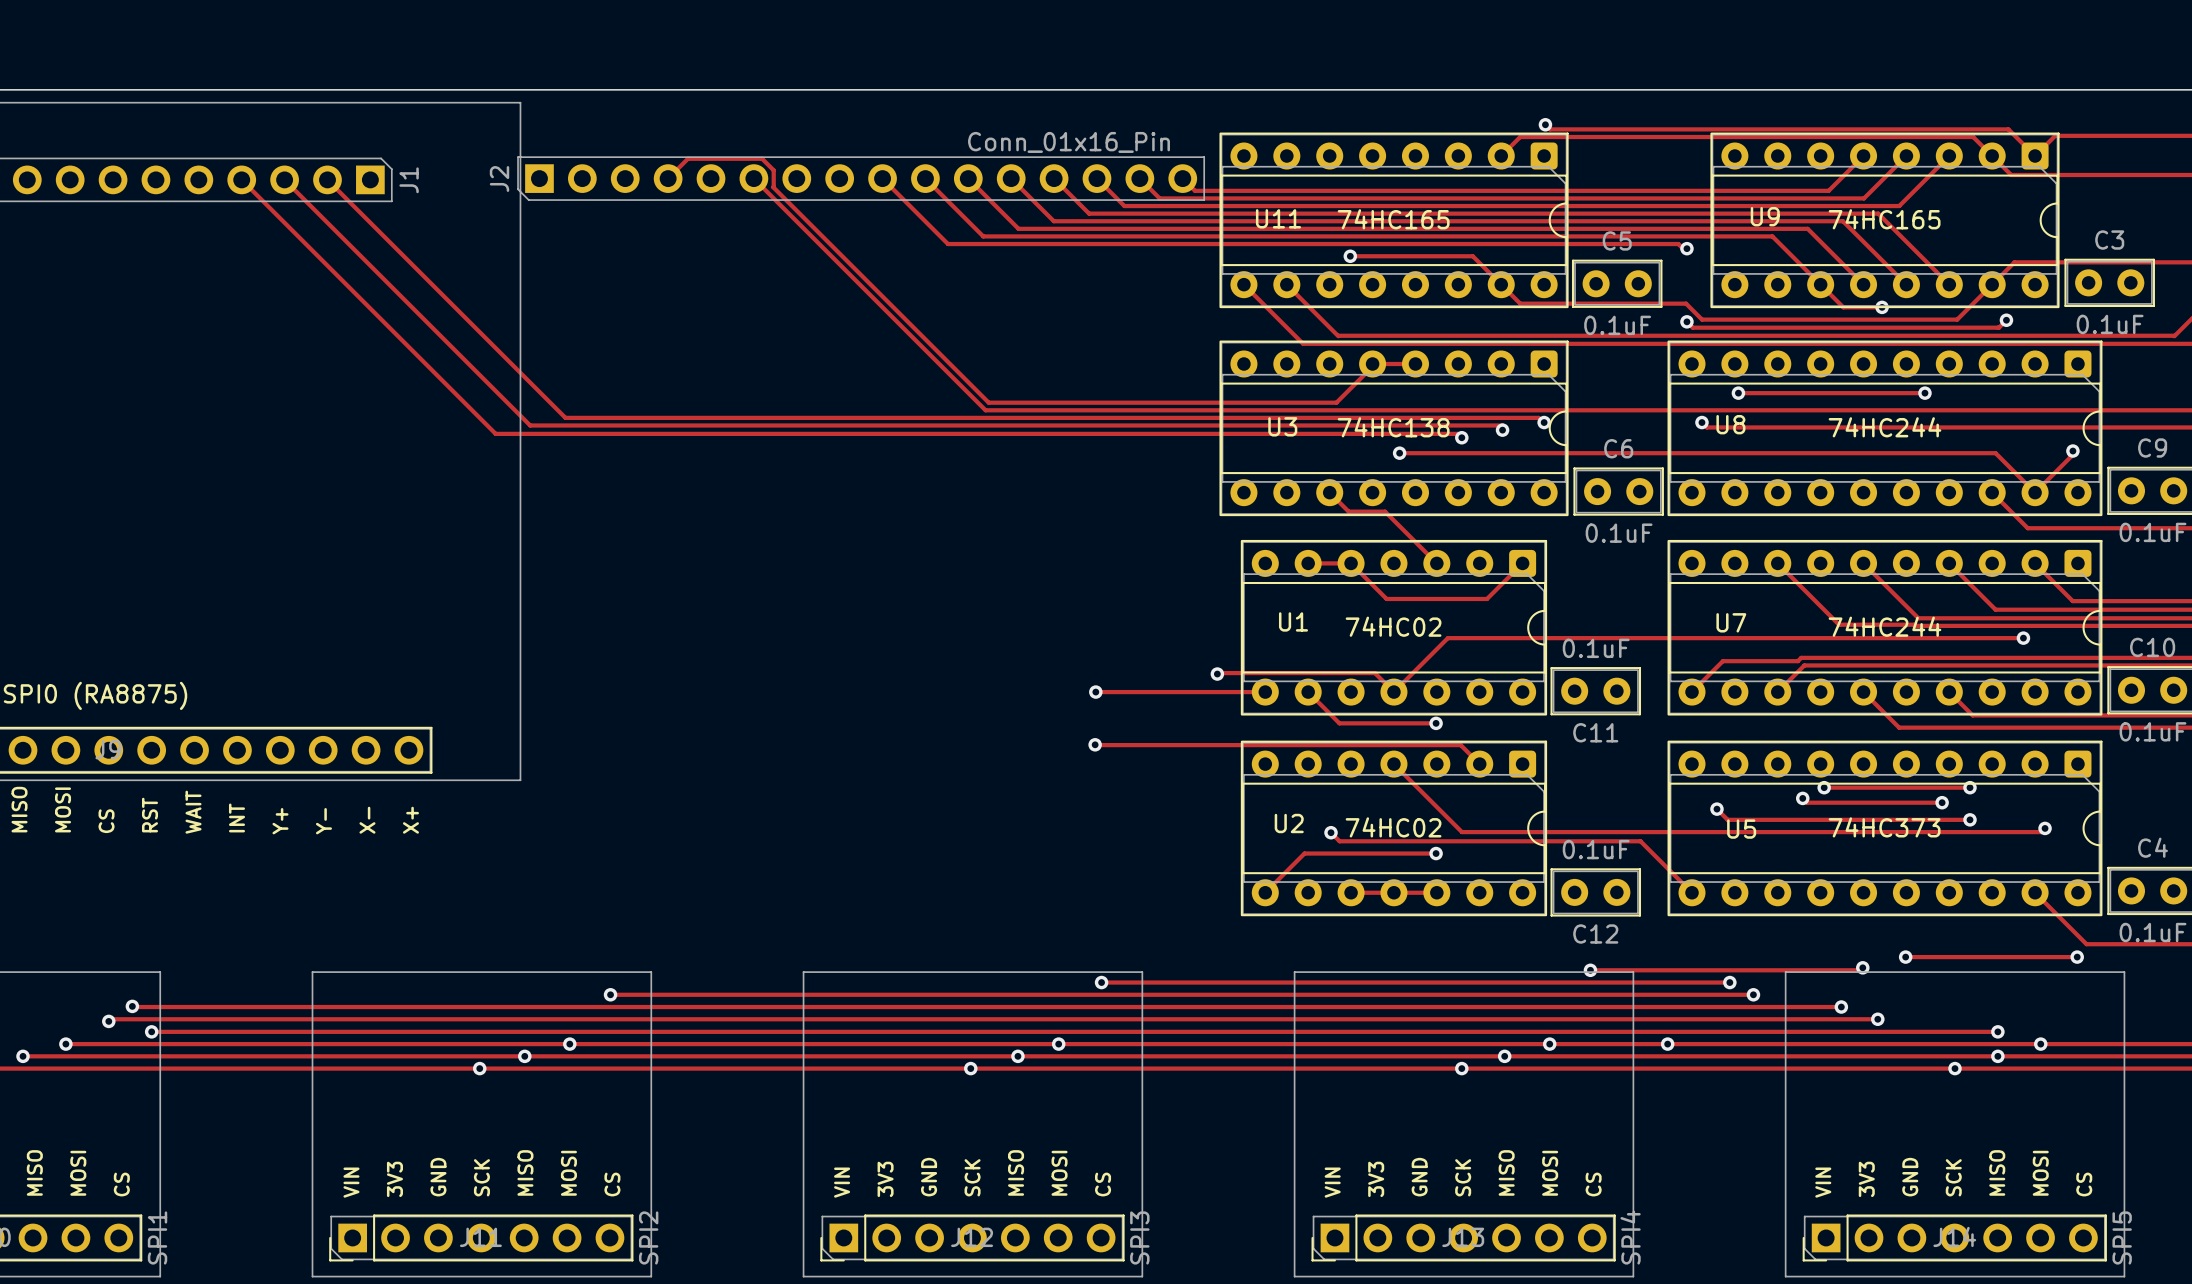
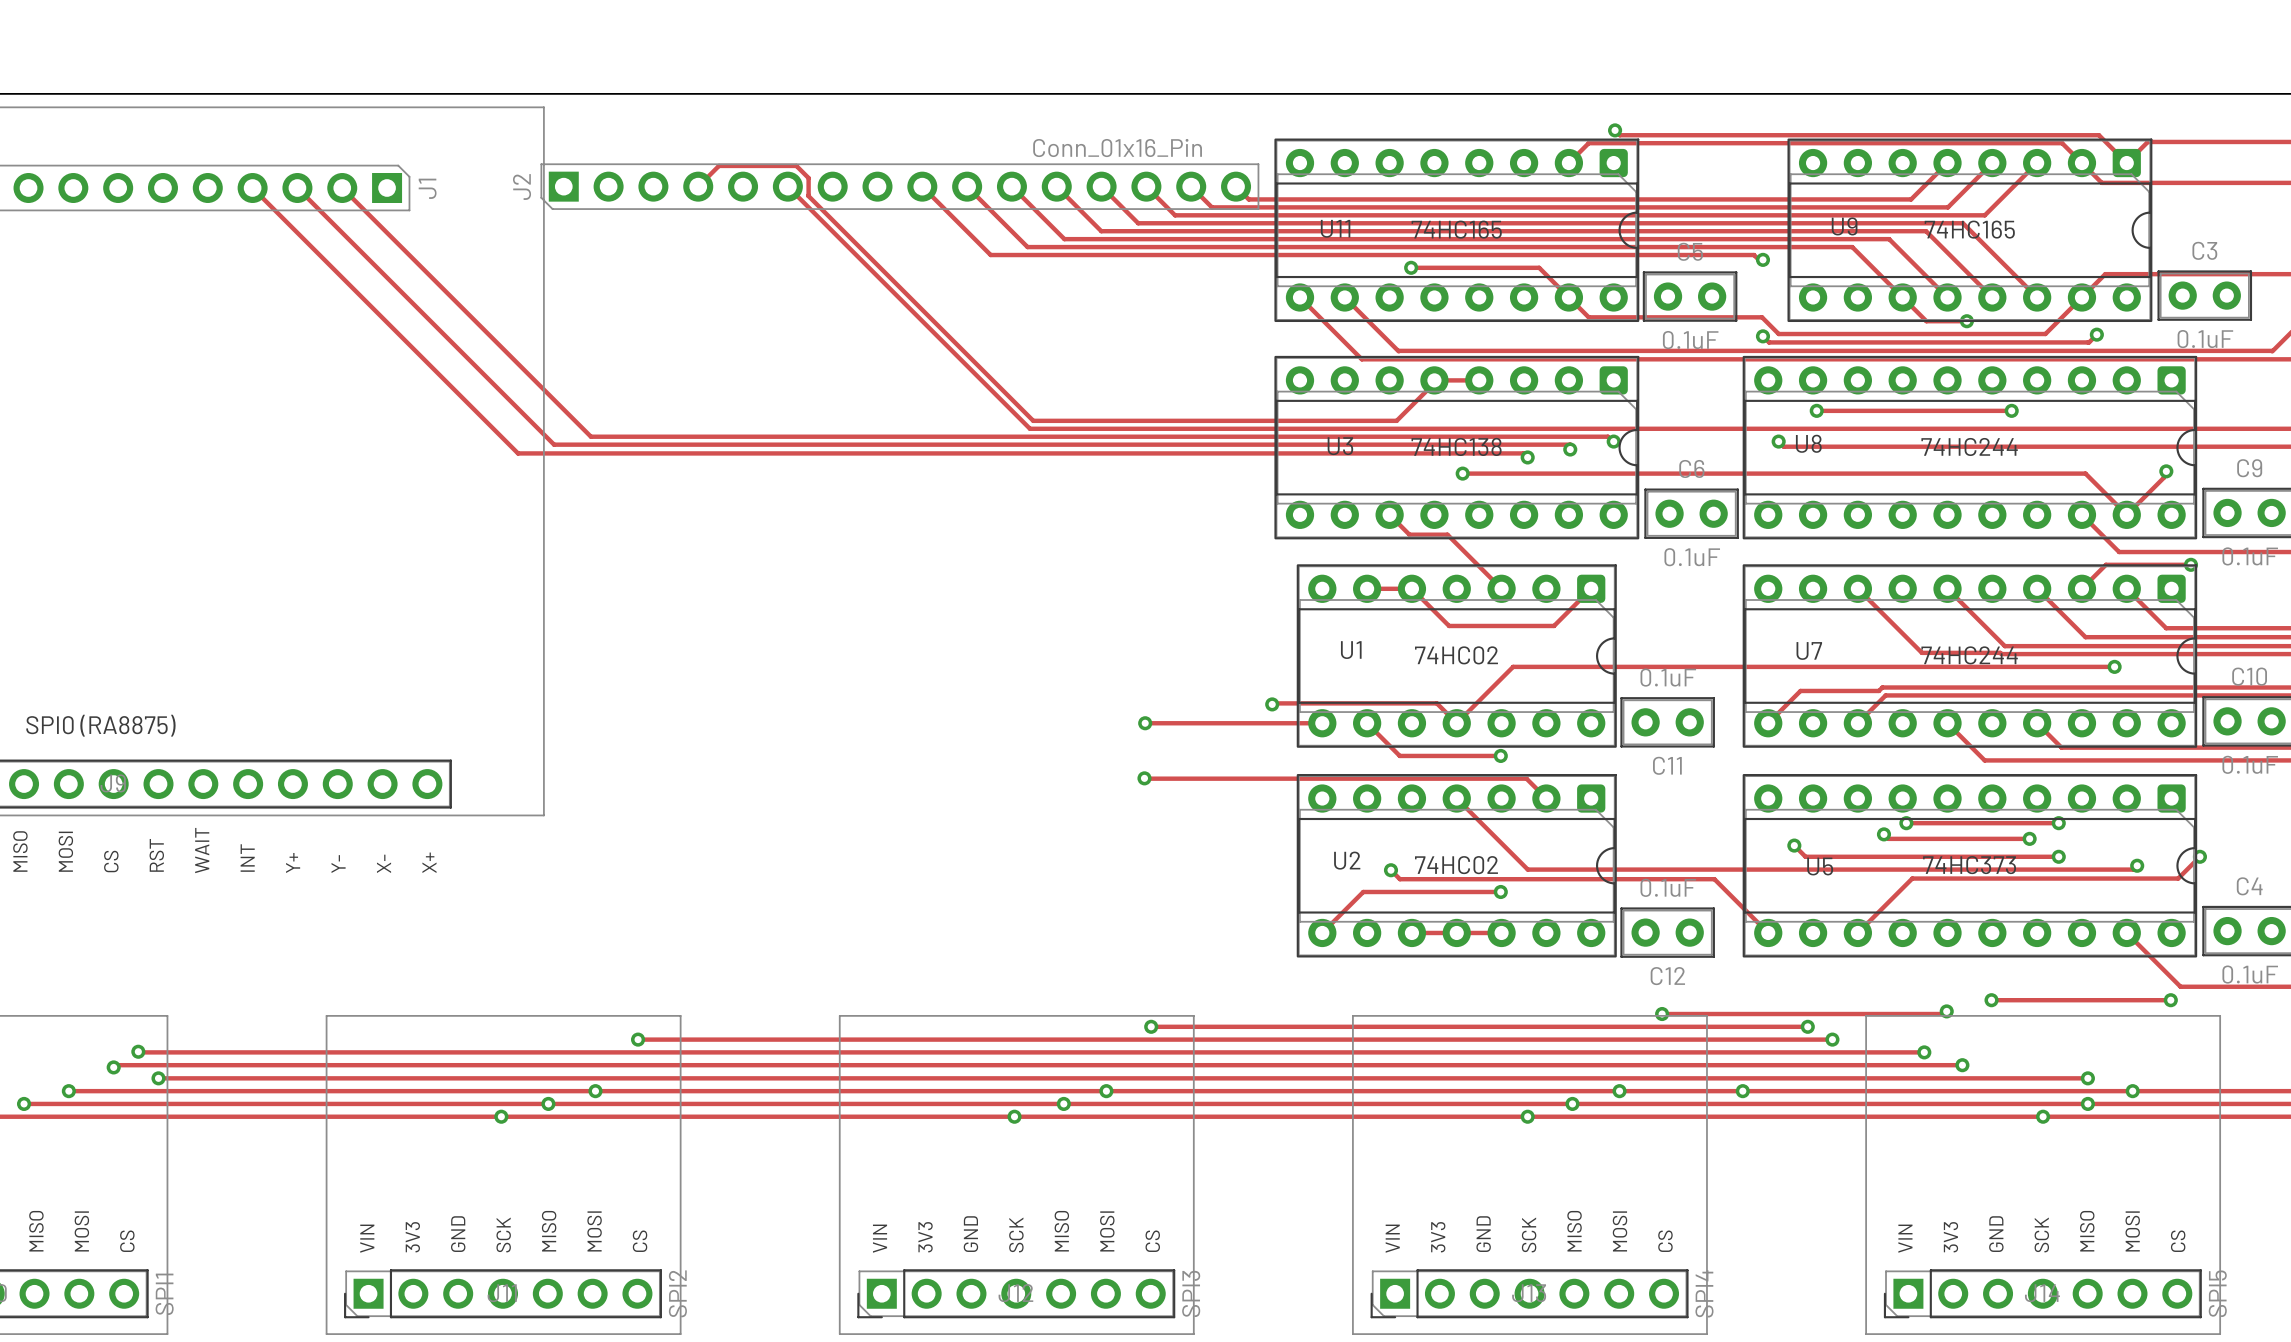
track: none -> (2190, 564) (2105, 564) (2081, 588)
via: none -> (2190, 564)
track: none -> (2199, 856) (2178, 878) (1912, 878) (1857, 932)
via: none -> (2199, 856)

